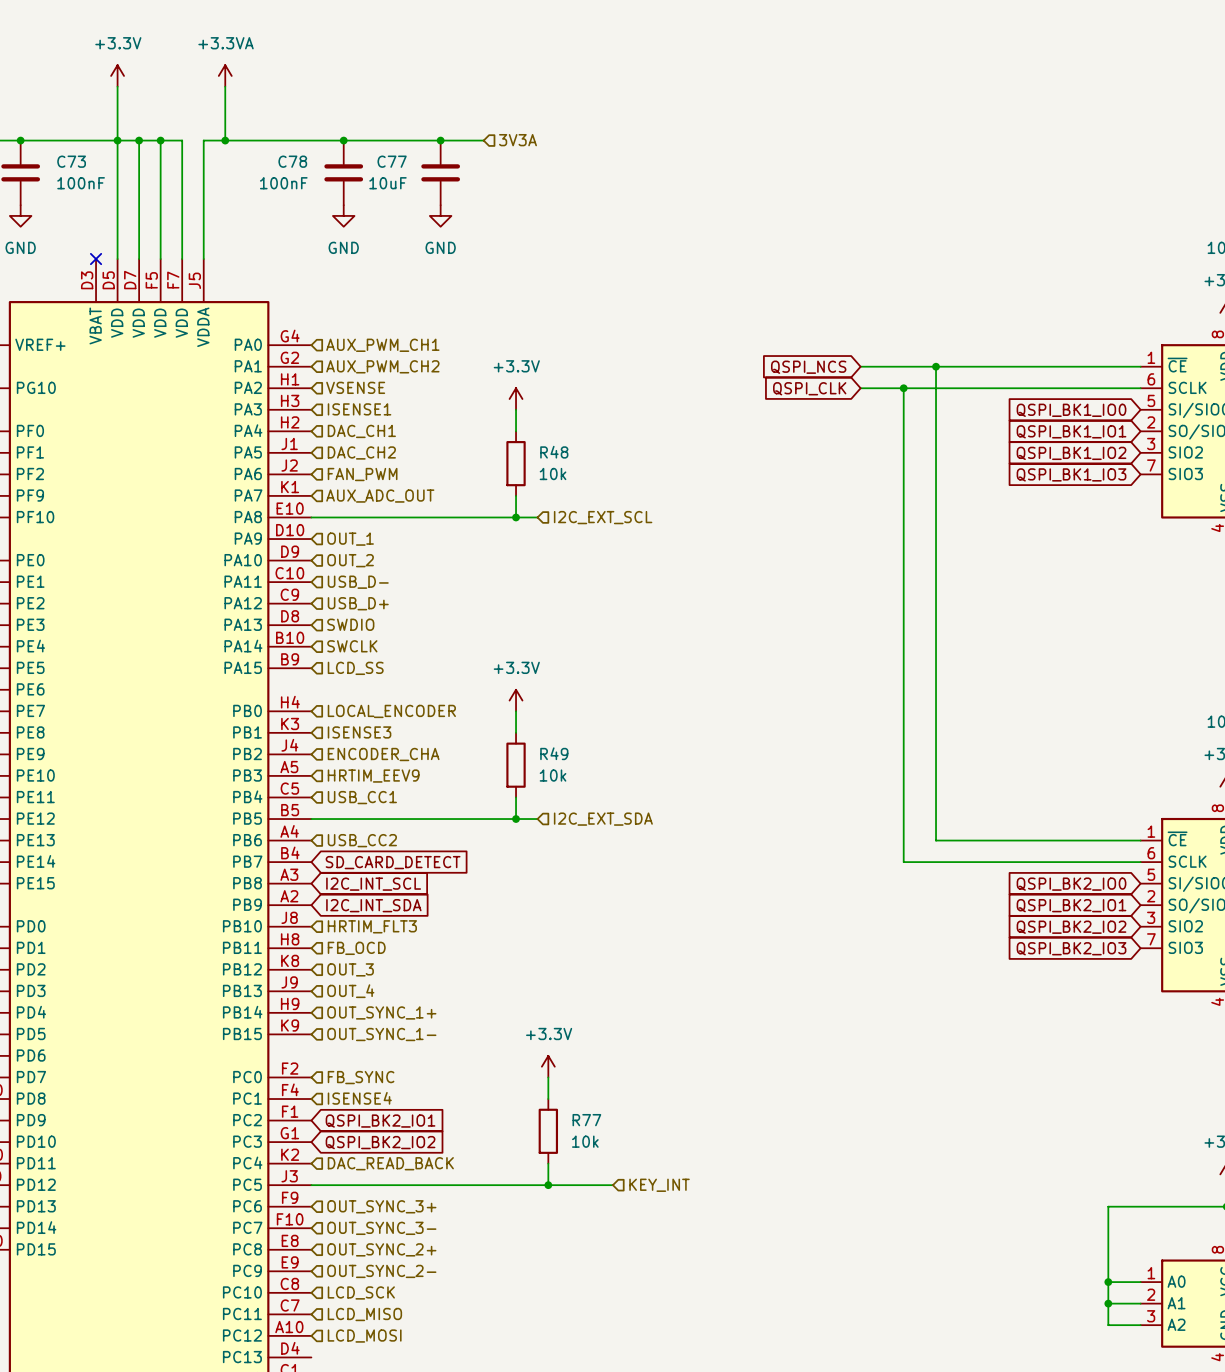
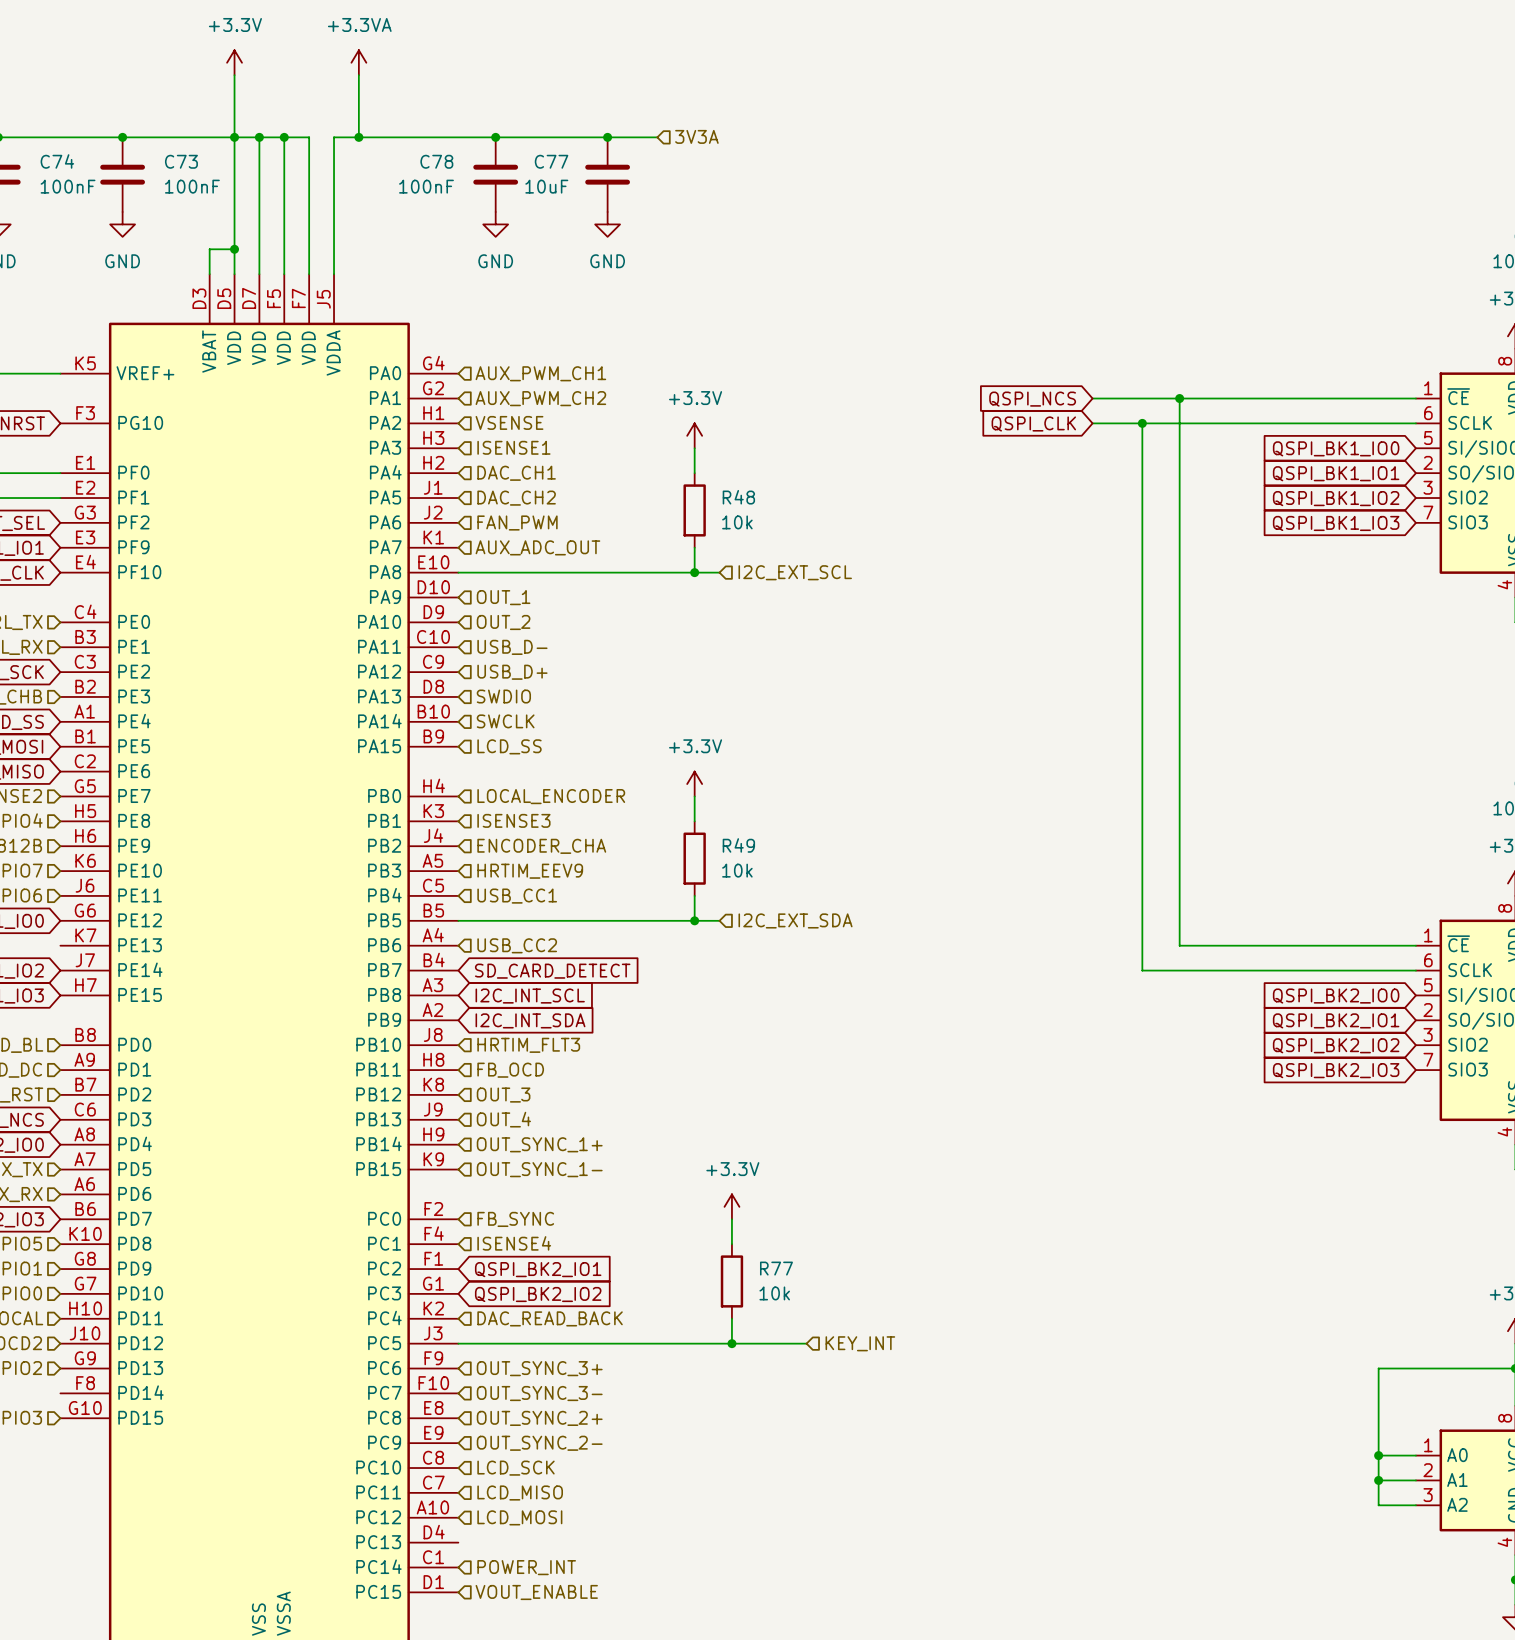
wire: none -> (234, 249) (209, 249) (209, 274)
junction: none -> (234, 249)
no-connect mark: (96, 259) -> none

